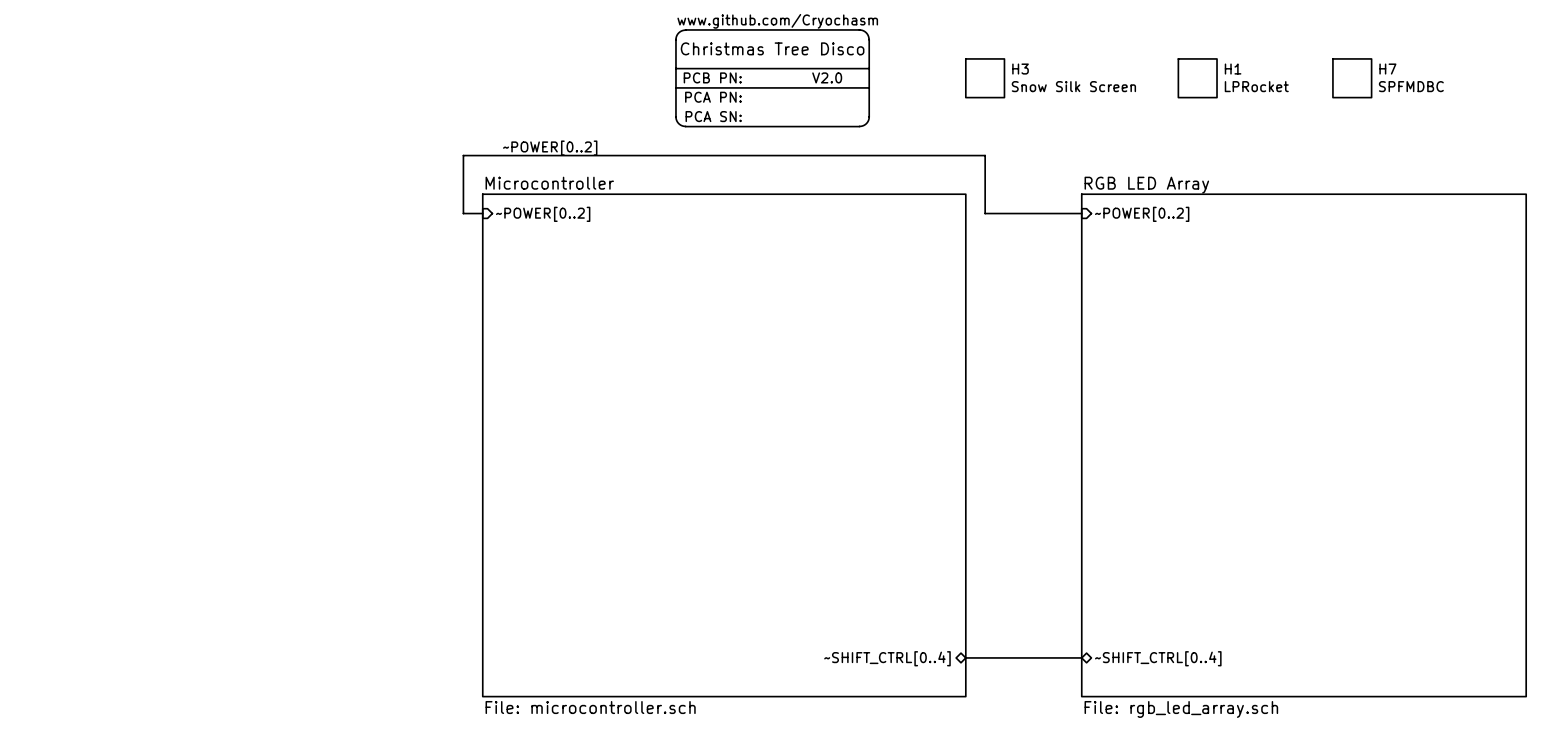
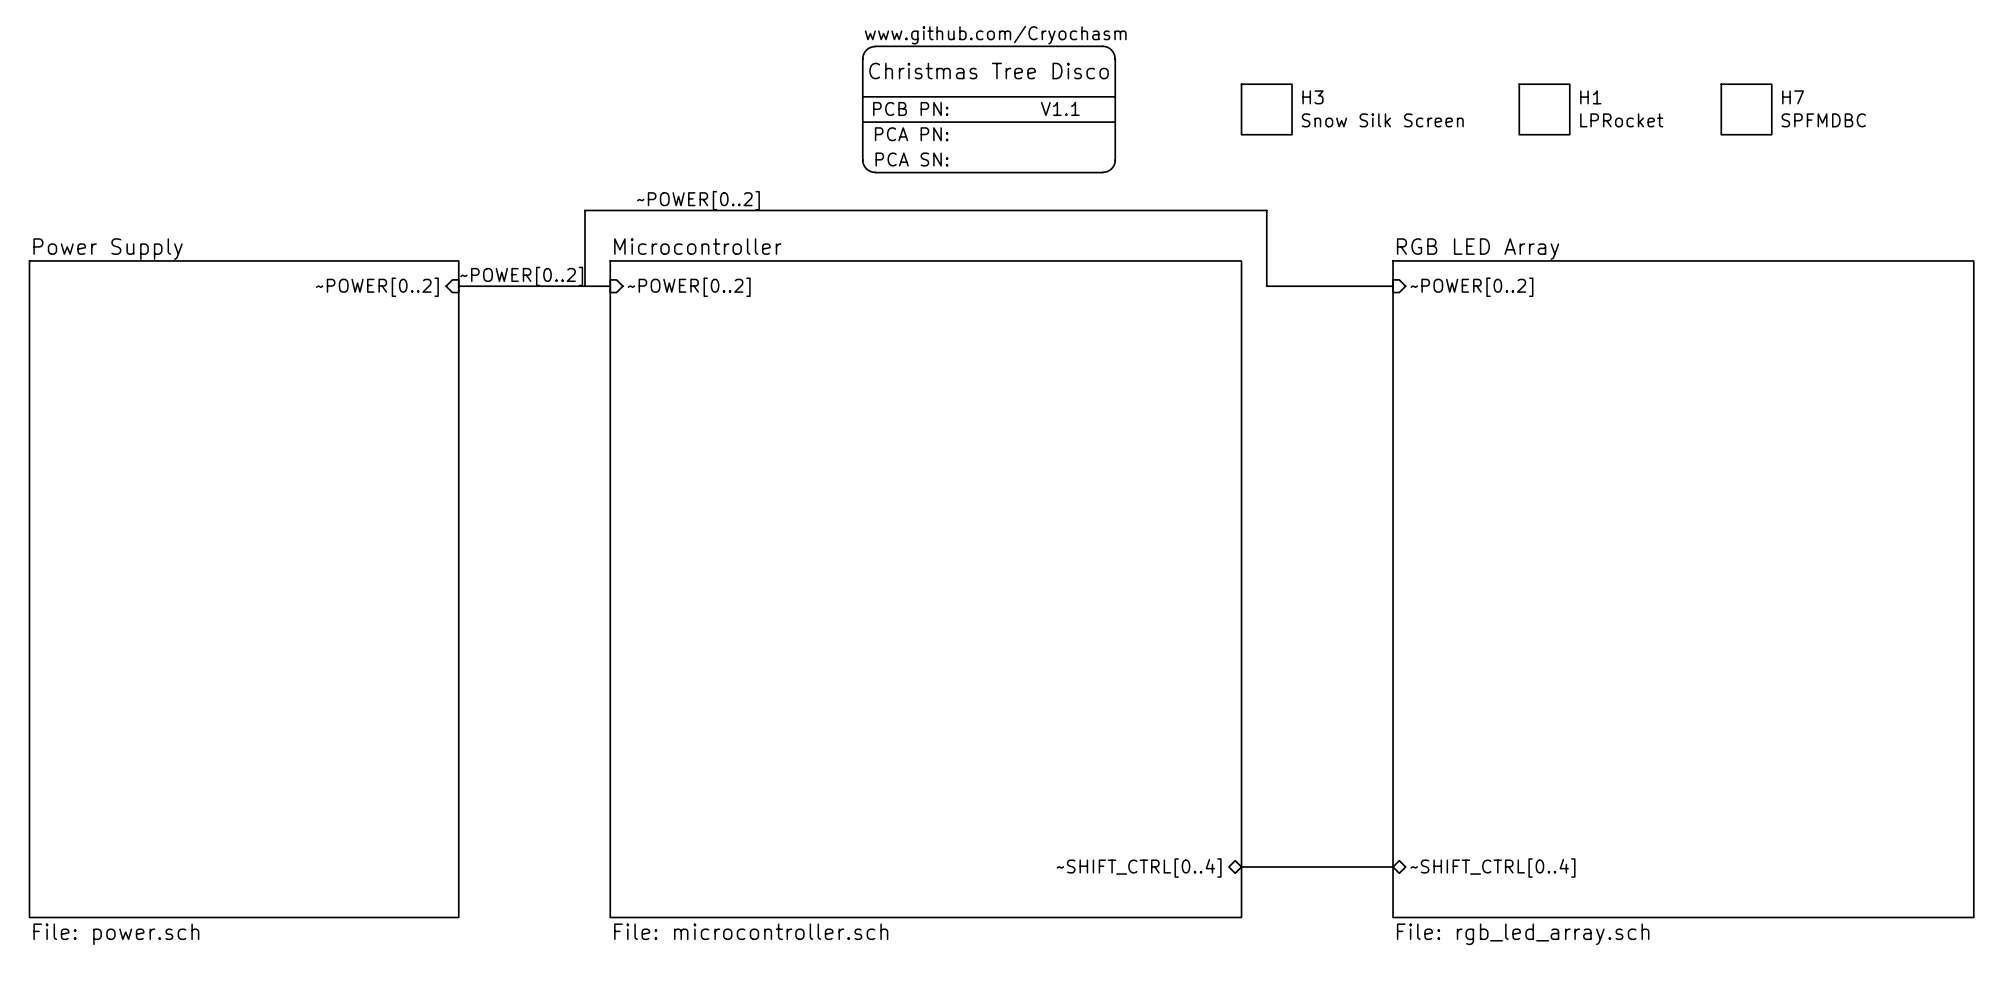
V2.0 name: V2.0 (827, 77) -> V1.1 (1060, 108)
label: none -> ~POWER[0..2] (521, 276)
bus: none -> (458, 286) (585, 286)
sheet pin: none -> ~POWER[0..2] (377, 287)
sheet Power Supply: none -> File: power.sch (244, 589)

